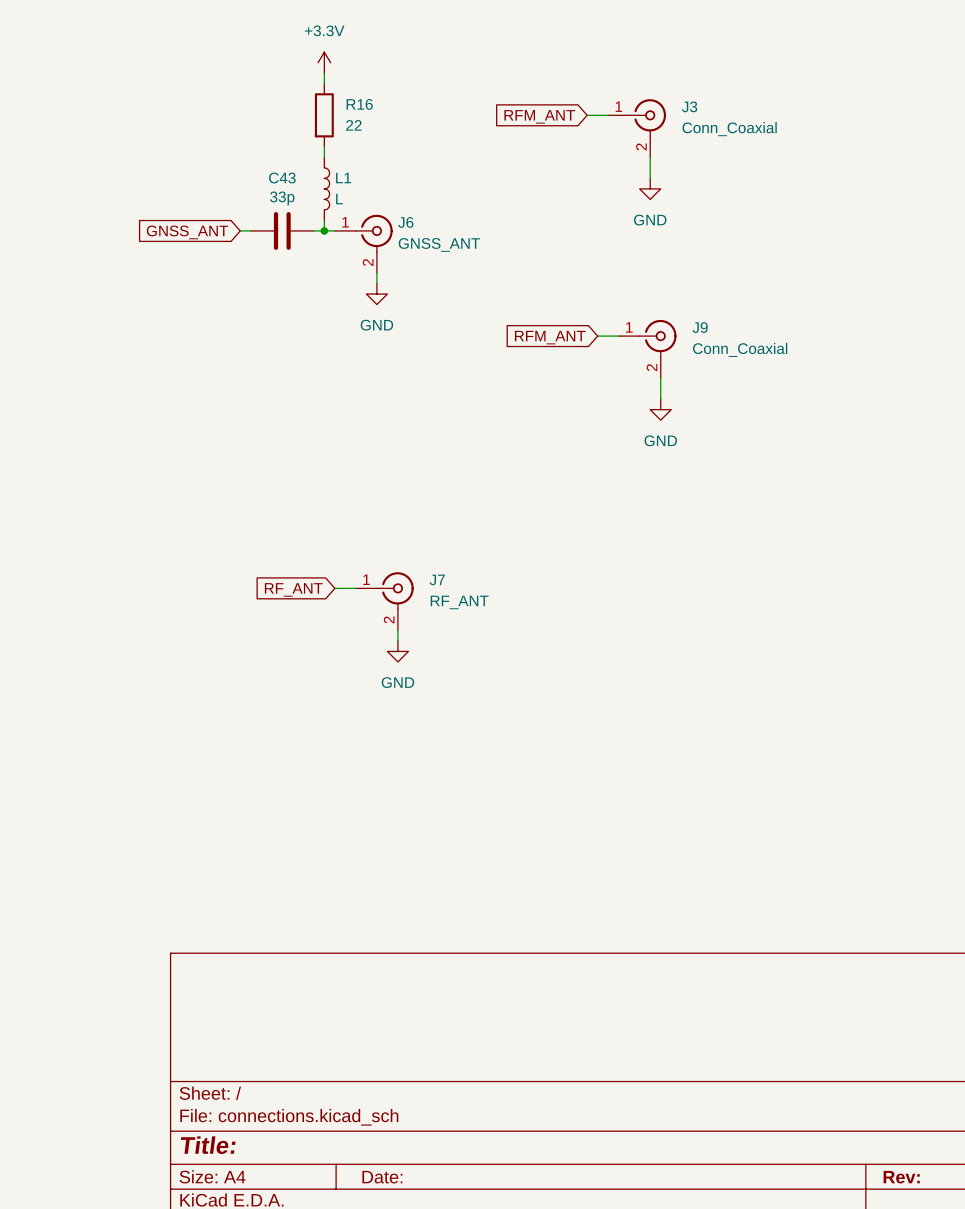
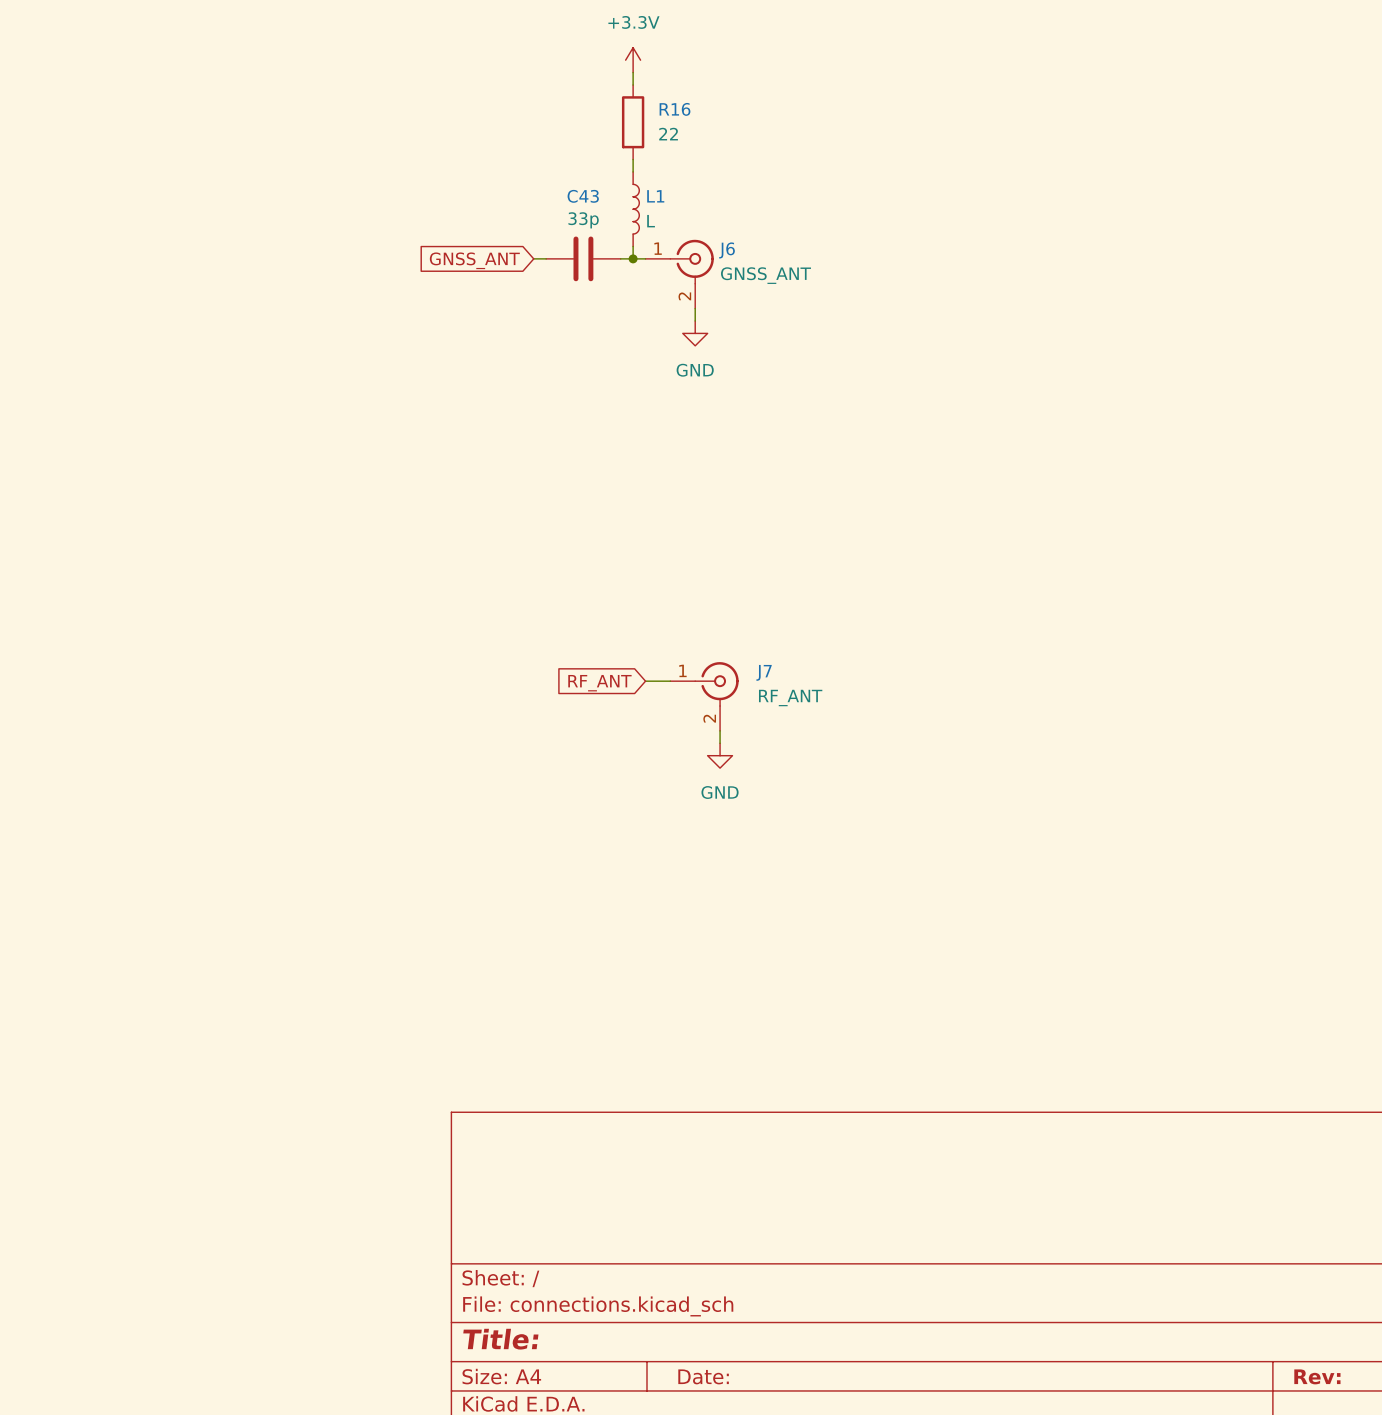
wire: (587, 115) (608, 115) -> none
global label: RFM_ANT (539, 116) -> none
J3: Conn_Coaxial (637, 128) -> none
wire: (650, 157) (650, 178) -> none
power symbol: GND (650, 188) -> none
wire: (597, 336) (618, 336) -> none
global label: RFM_ANT (550, 337) -> none
J9: Conn_Coaxial (647, 349) -> none
wire: (660, 378) (660, 399) -> none
power symbol: GND (660, 409) -> none

